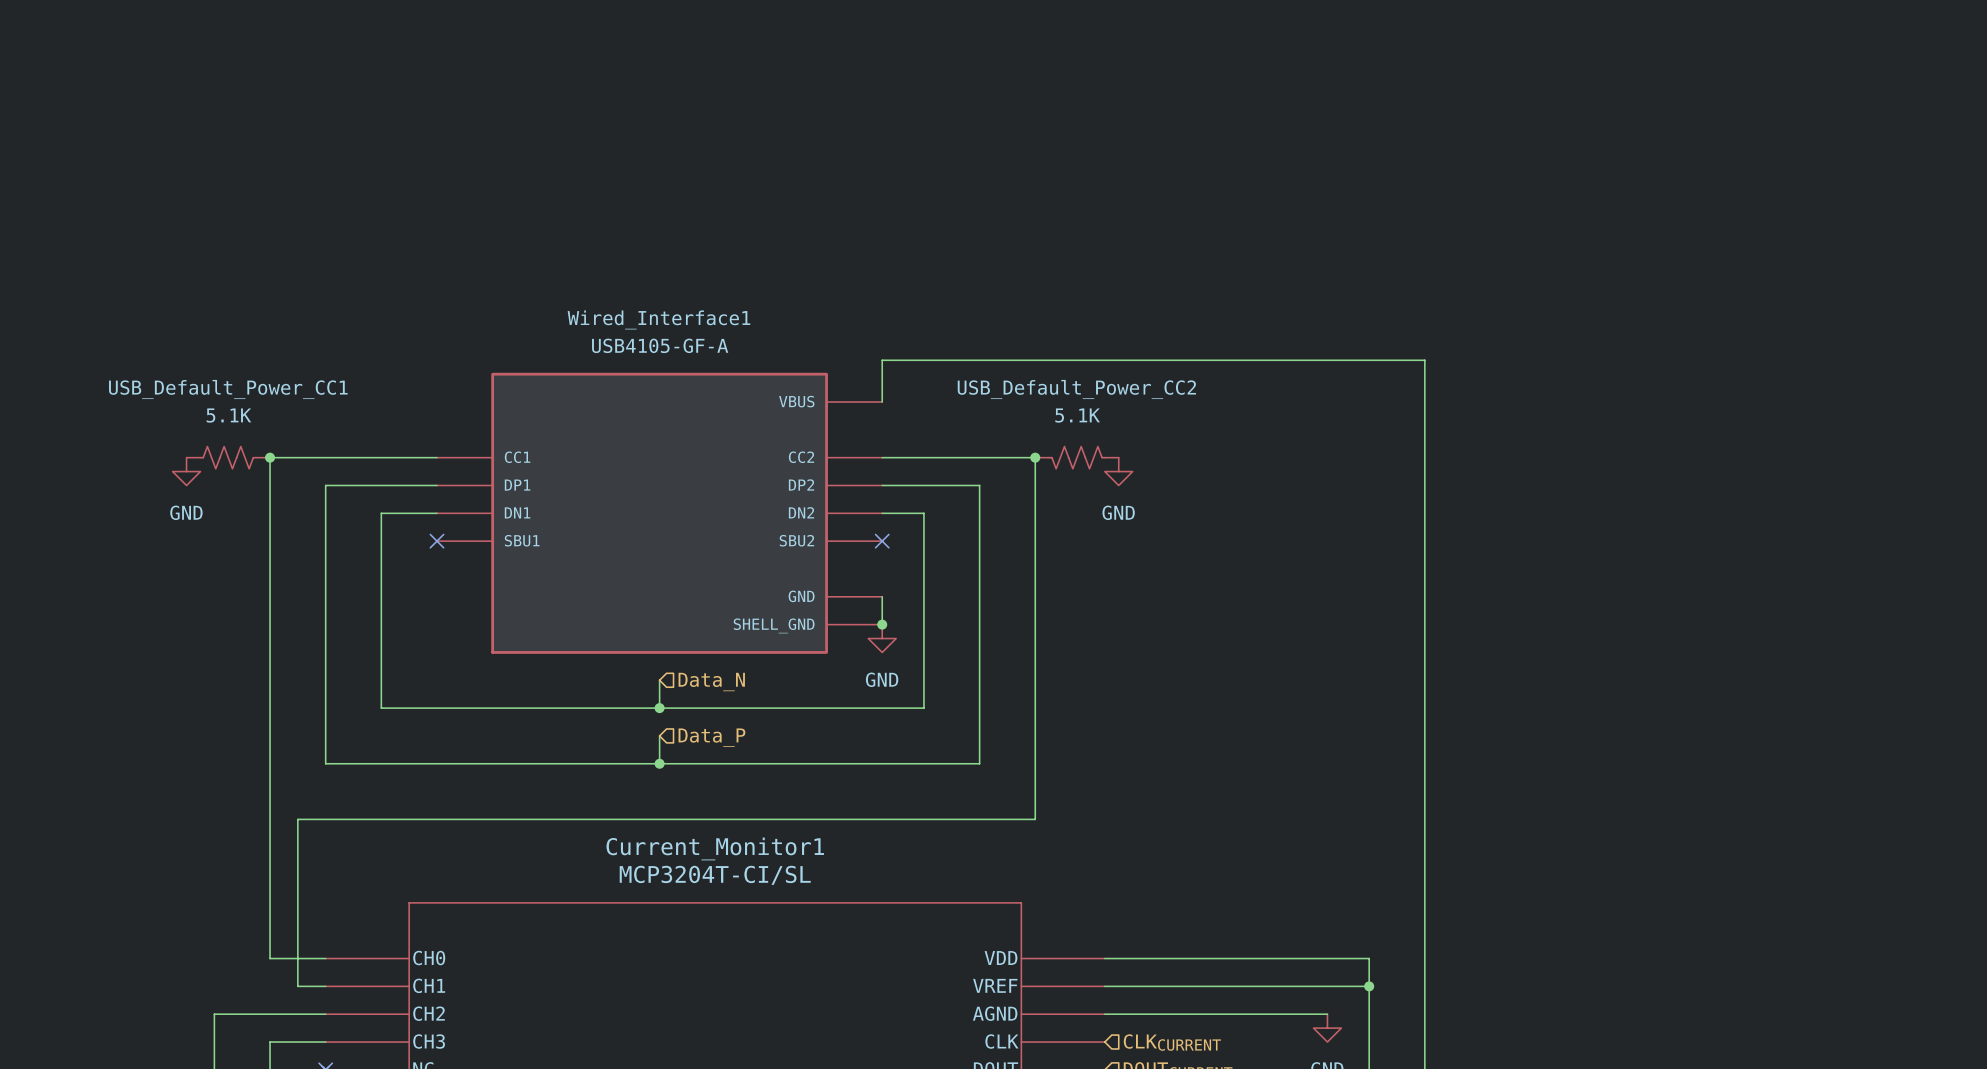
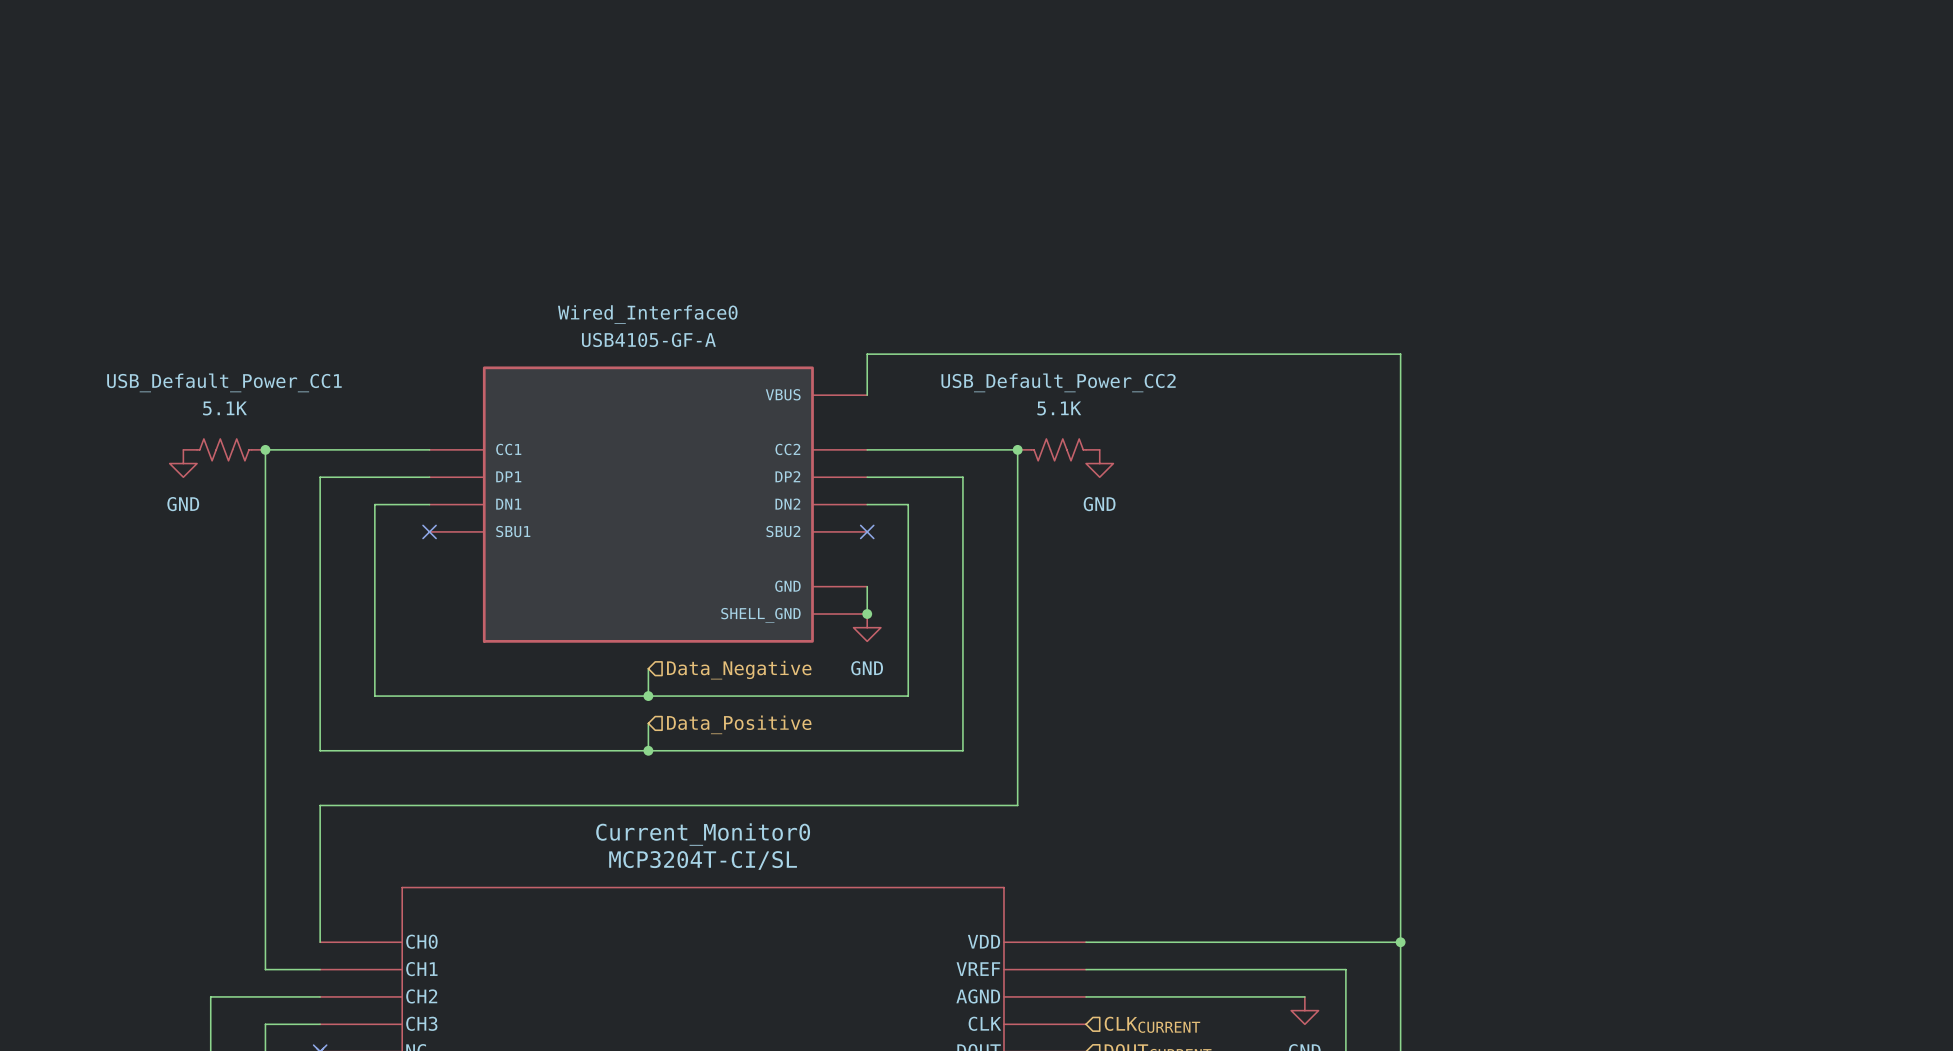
Wired_Interface1 name: Wired_Interface1 (658, 319) -> Wired_Interface0 (647, 314)
hierarchical label: Data_N (711, 682) -> Data_Negative (739, 670)
hierarchical label: Data_P (711, 737) -> Data_Positive (739, 724)
wire: (325, 819) (297, 819) (297, 986) -> (320, 805) (320, 942)
Current_Monitor1 name: Current_Monitor1 (715, 848) -> Current_Monitor0 (703, 834)
wire: (270, 958) (325, 958) -> (265, 942) (265, 969) (292, 969)
wire: (1369, 958) (1369, 986) -> (1345, 942) (1400, 942)
junction position: (1369, 986) -> (1400, 942)

